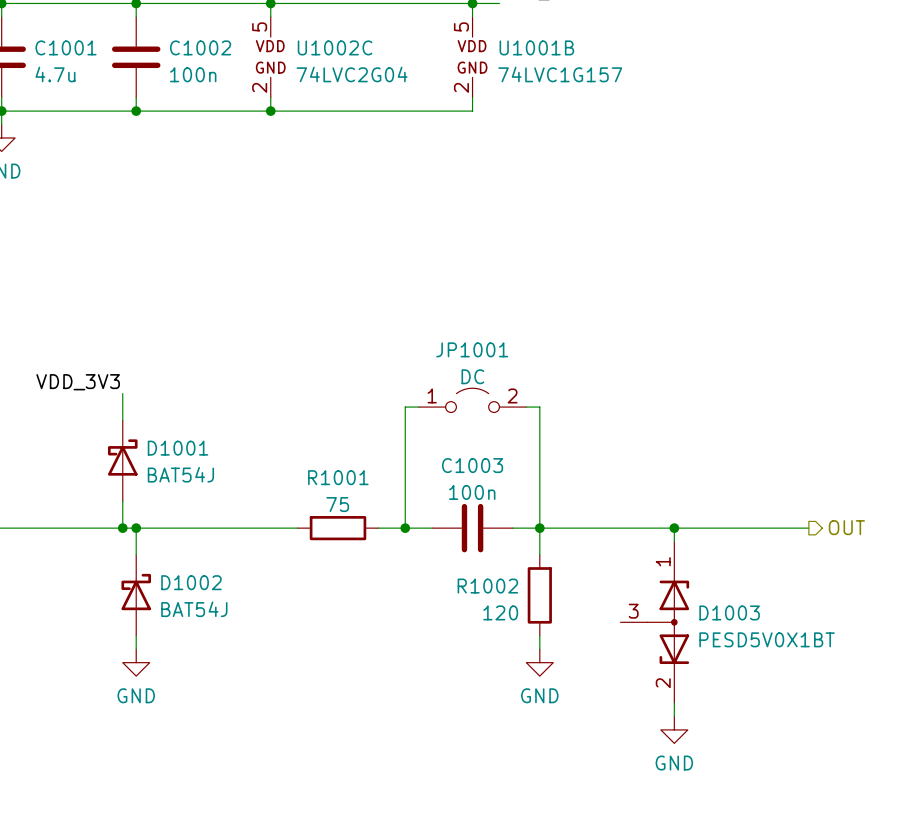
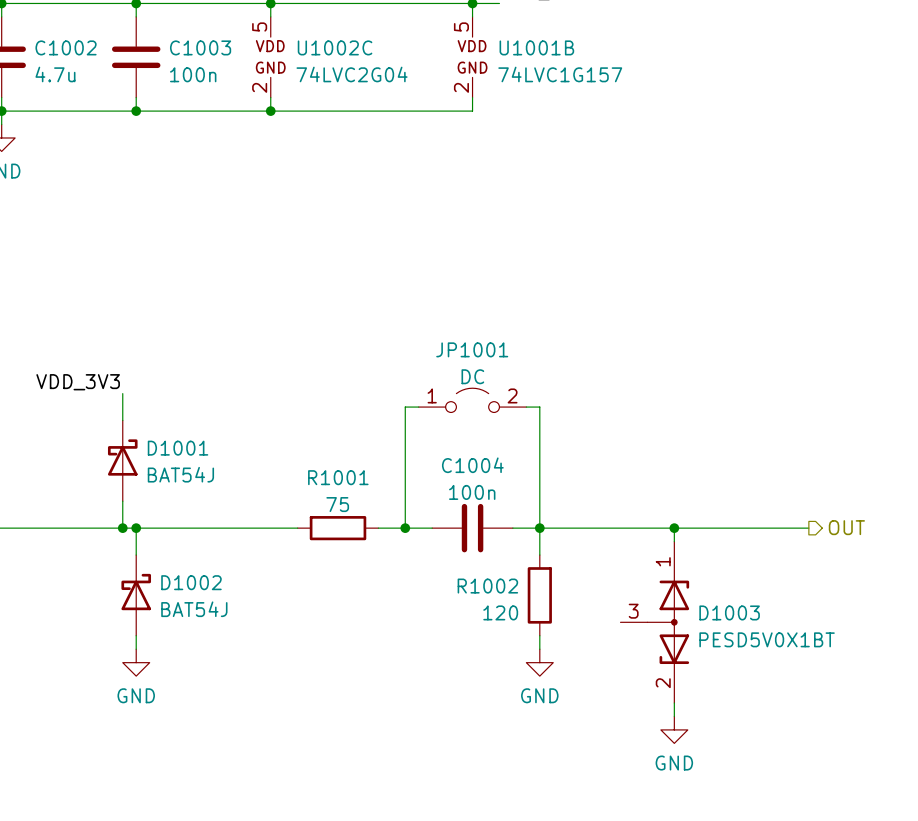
C1001 name: C1001 (66, 47) -> C1002 (66, 47)
C1002 name: C1002 (200, 47) -> C1003 (200, 47)
C1003 name: C1003 (472, 465) -> C1004 (472, 465)

